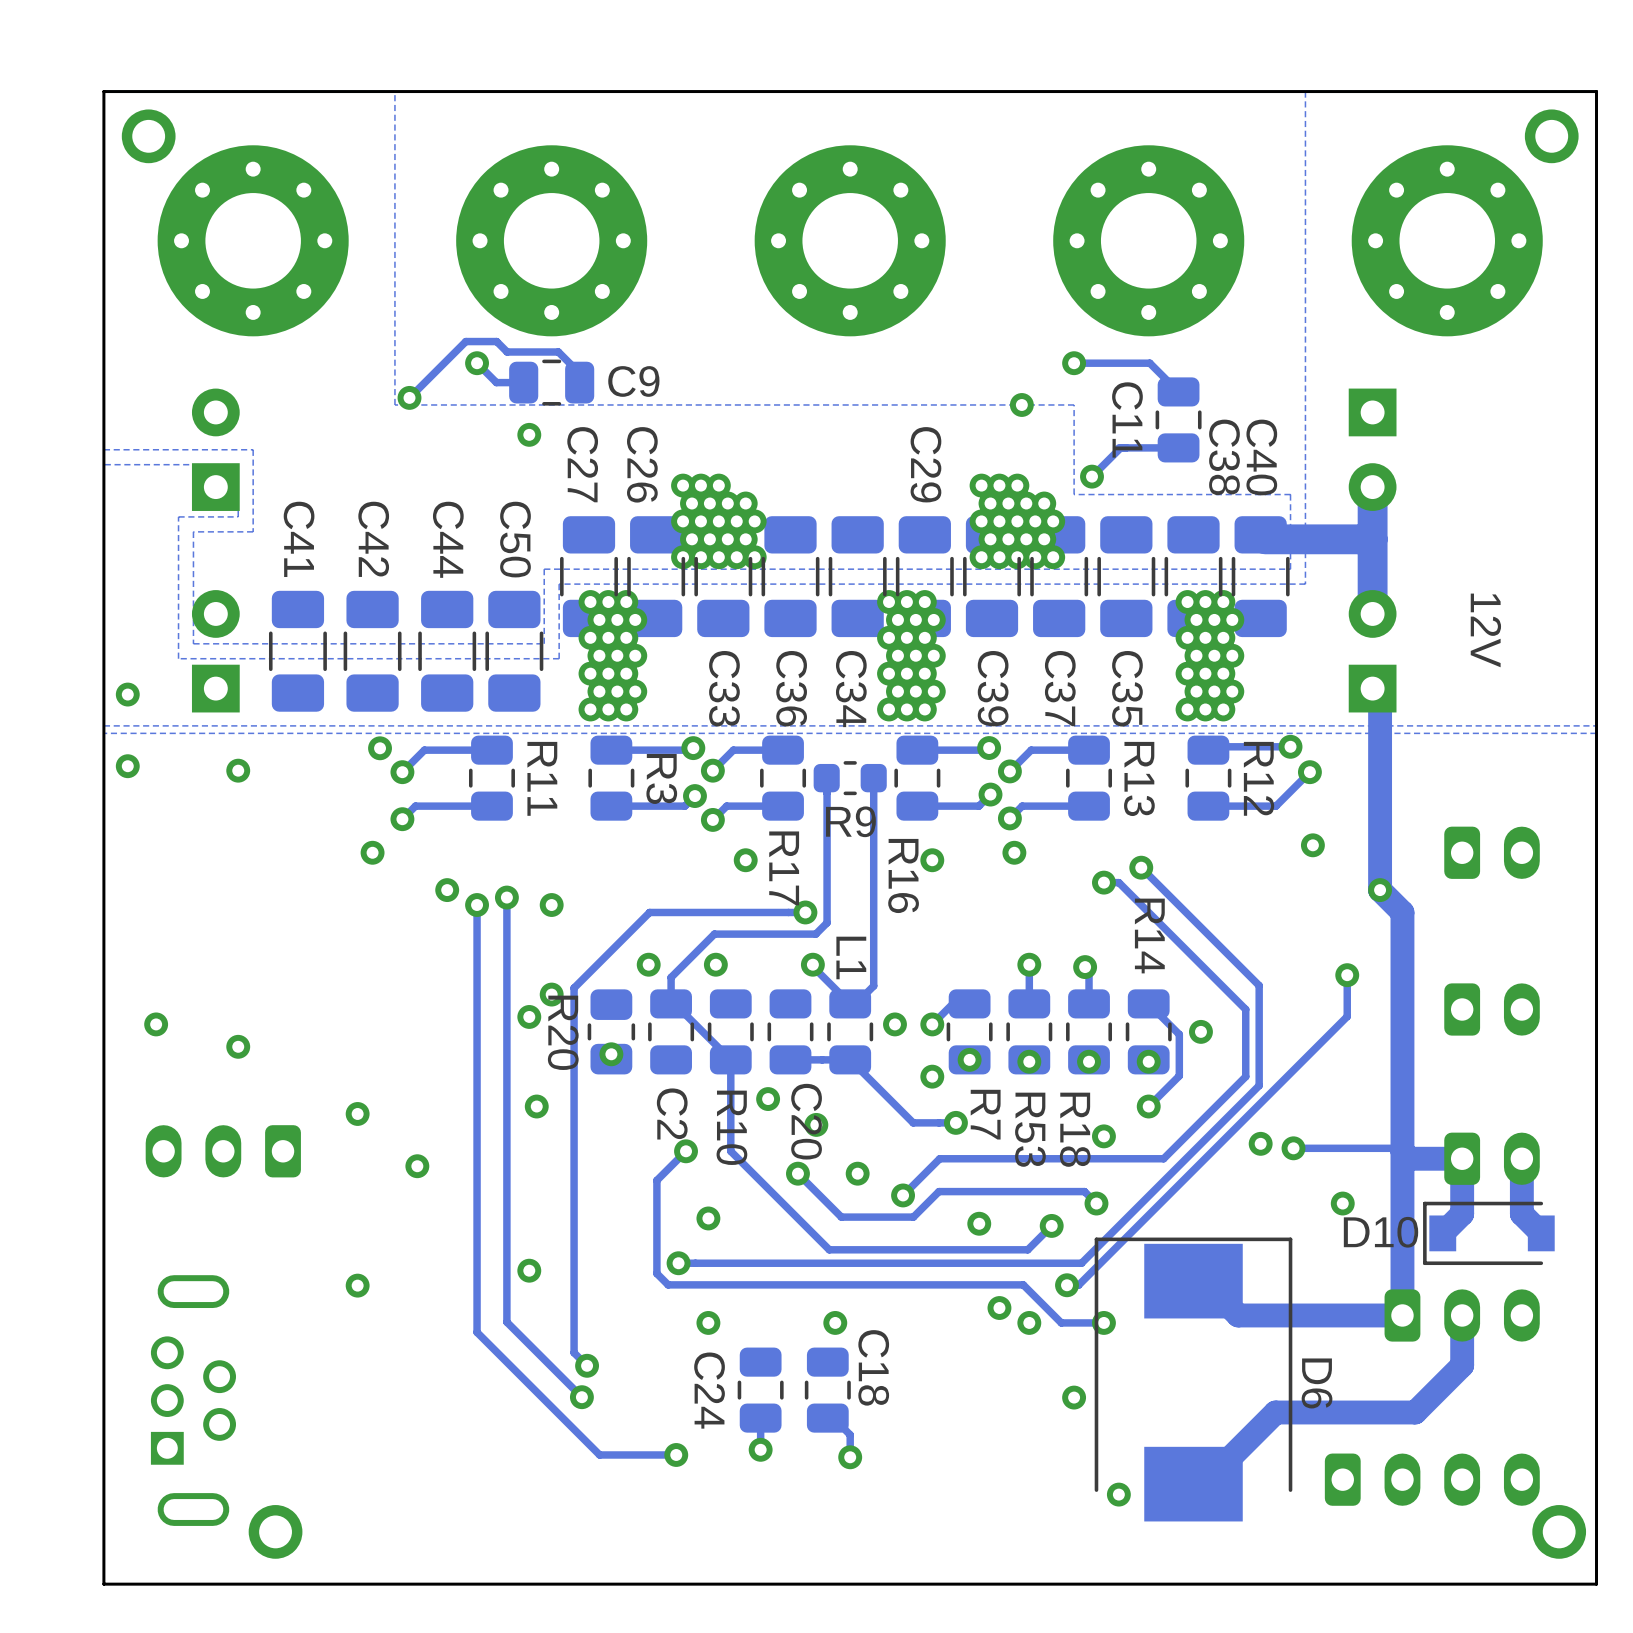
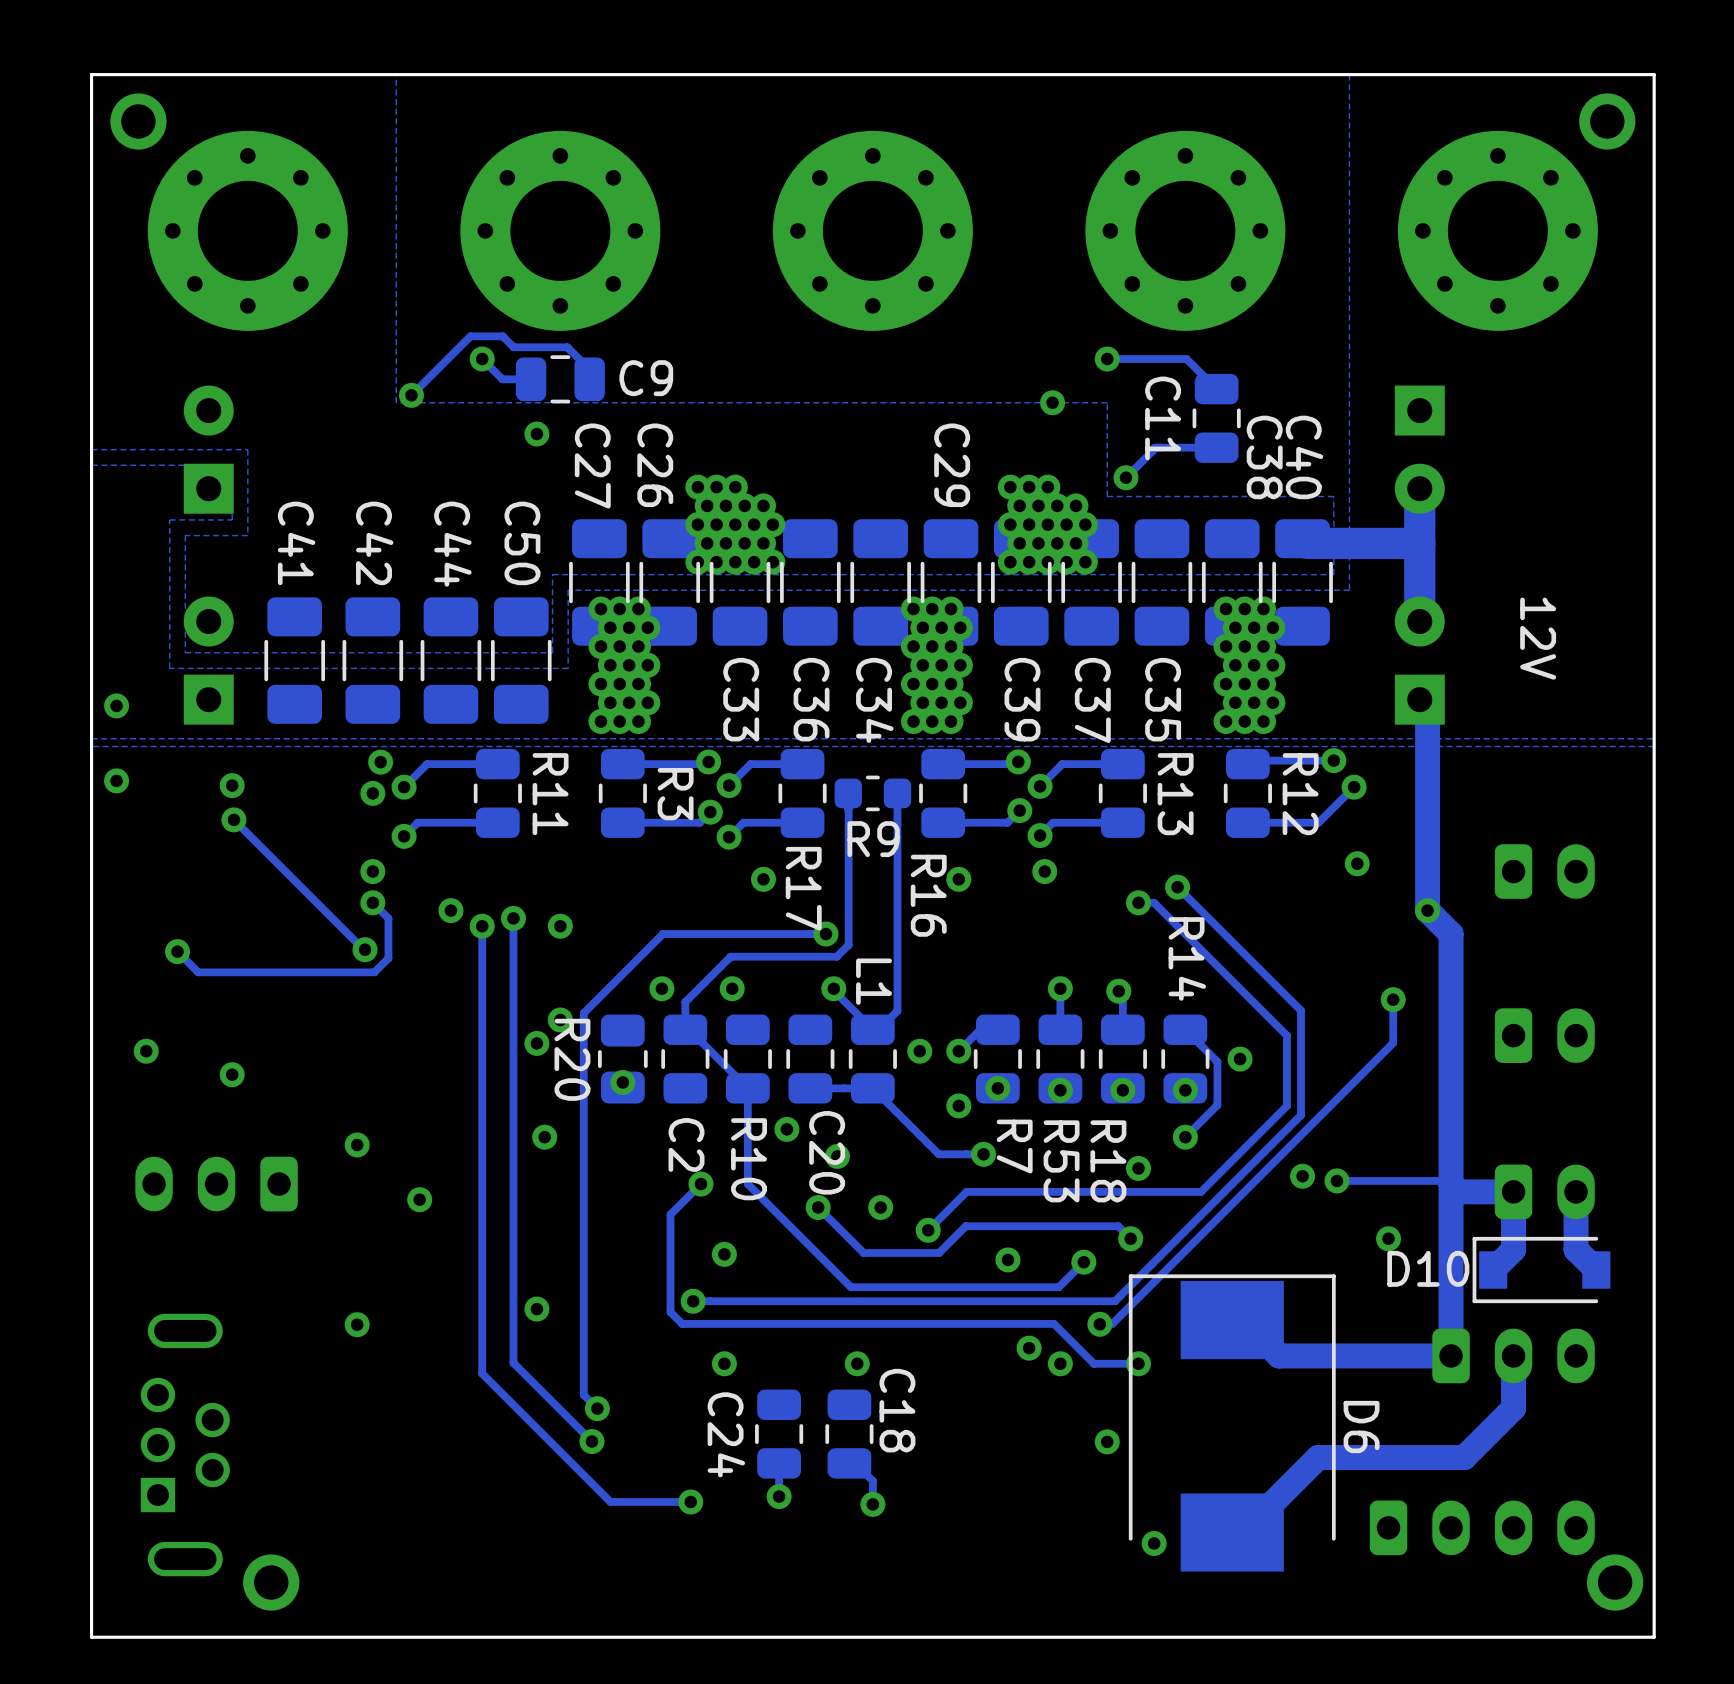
via: none -> (372, 793)
track: none -> (233, 819) (365, 949)
via: none -> (233, 819)
track: none -> (372, 902) (388, 918) (388, 958) (374, 972) (198, 972) (177, 951)
via: none -> (372, 902)
via: none -> (365, 949)
via: none -> (177, 951)

